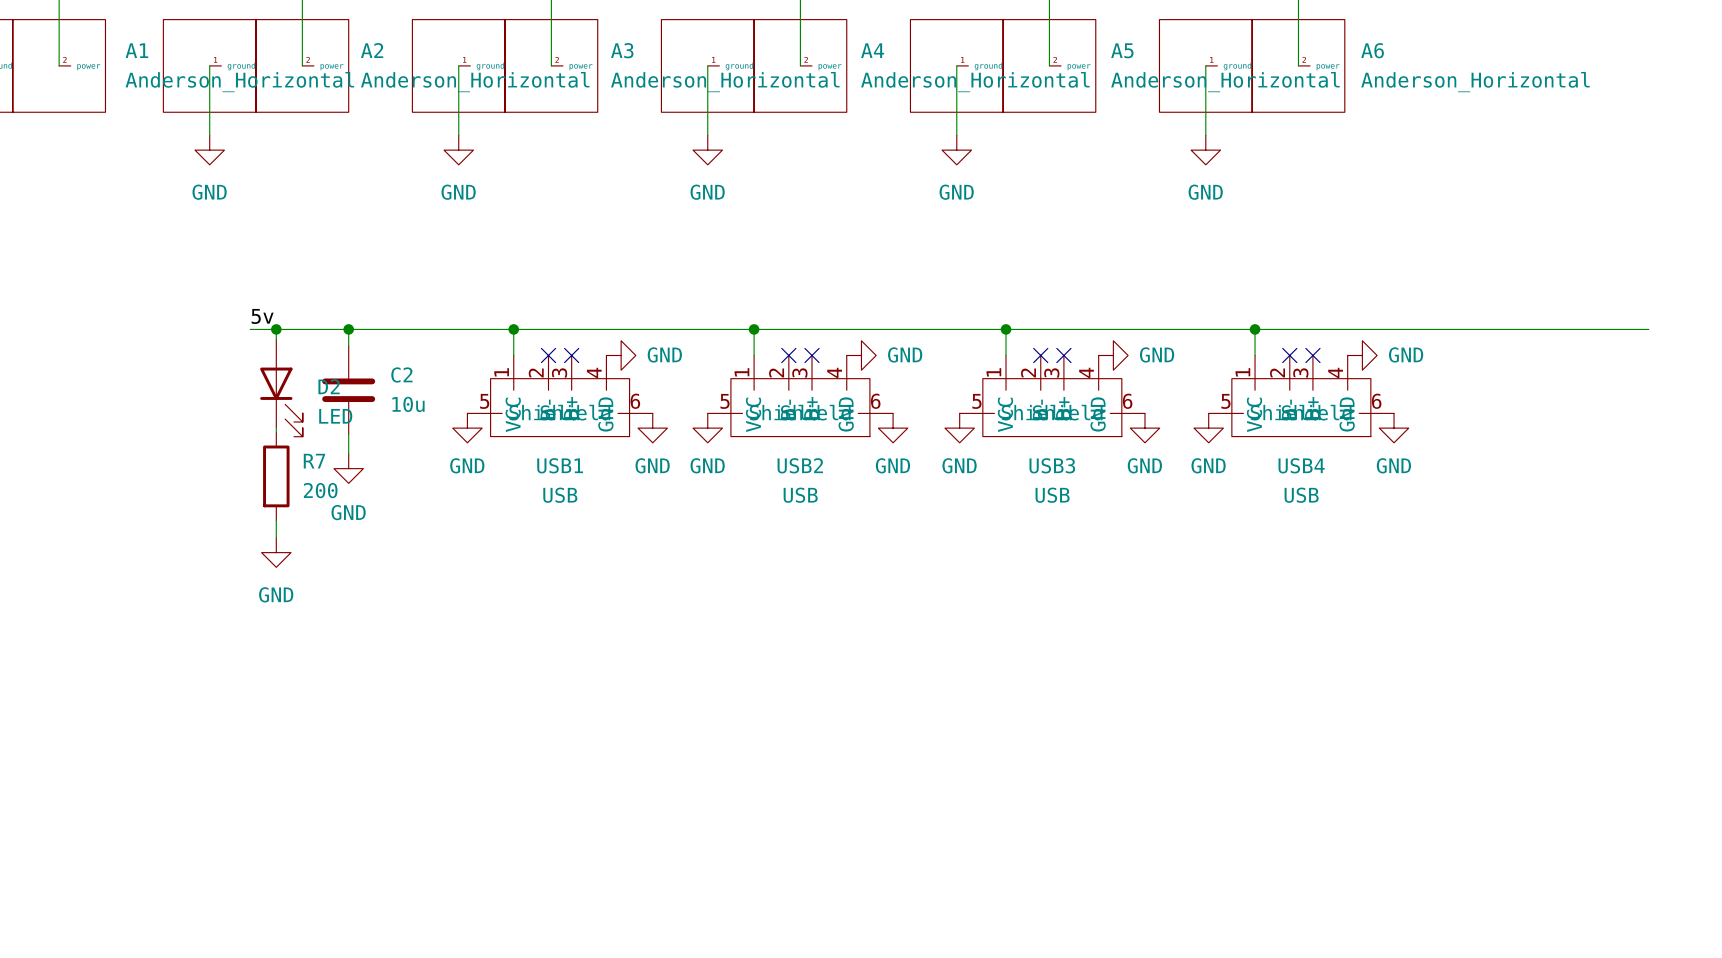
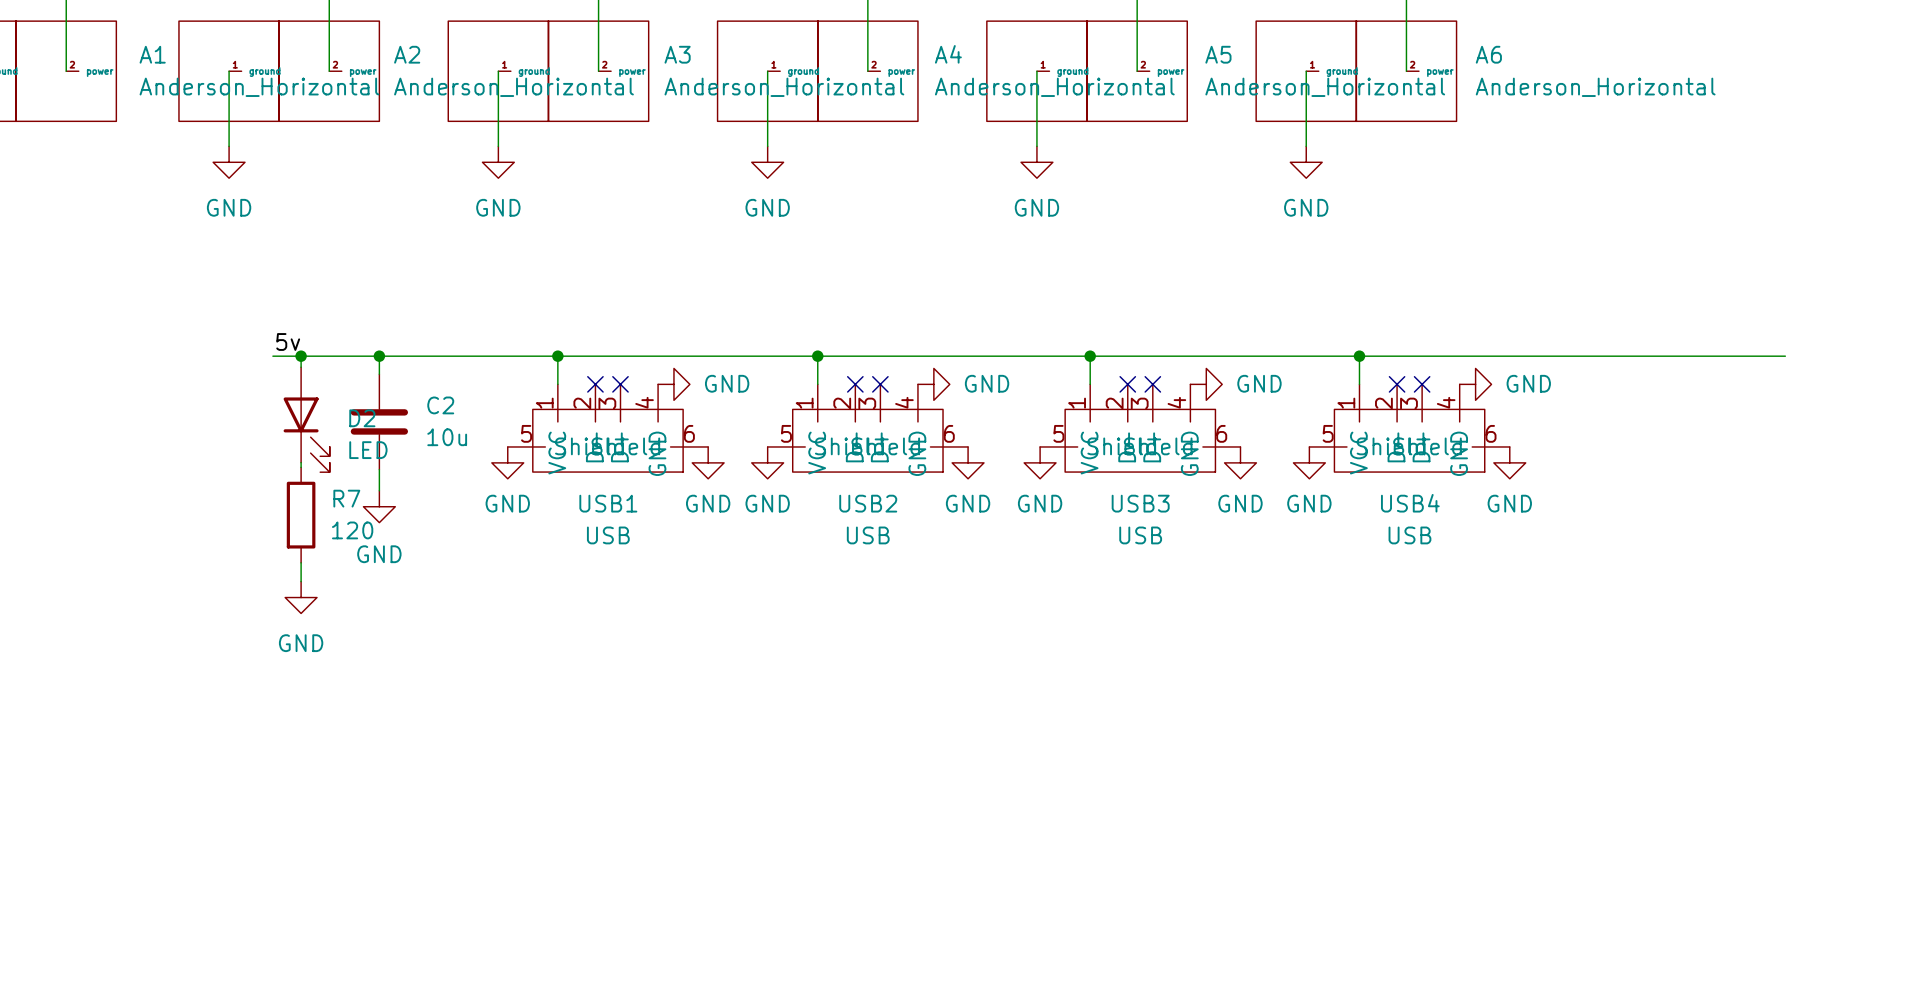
R7 value: 200 (320, 490) -> 120 (352, 530)

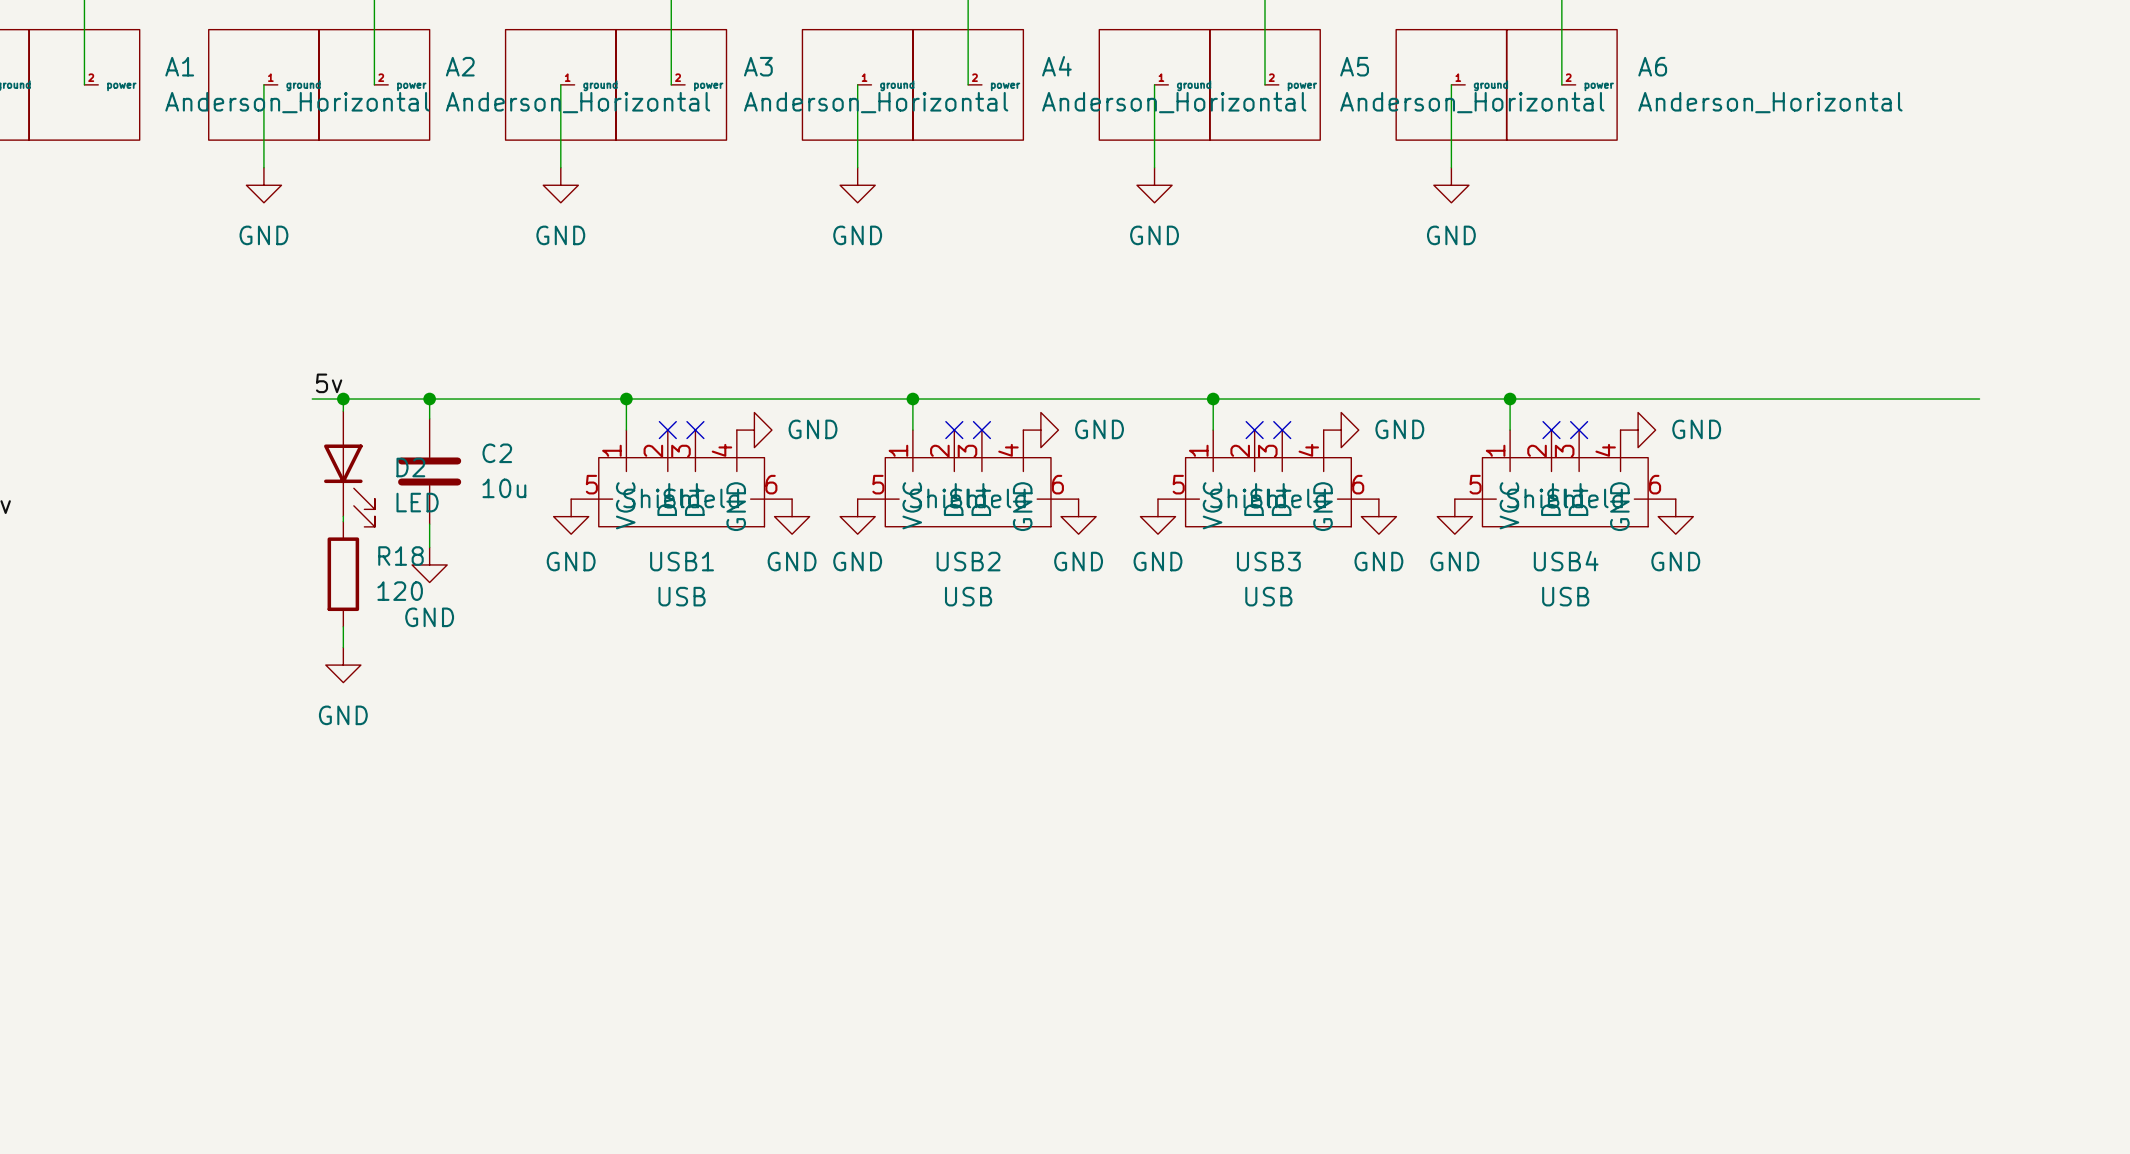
R7 name: R7 (346, 498) -> R18 (400, 556)

